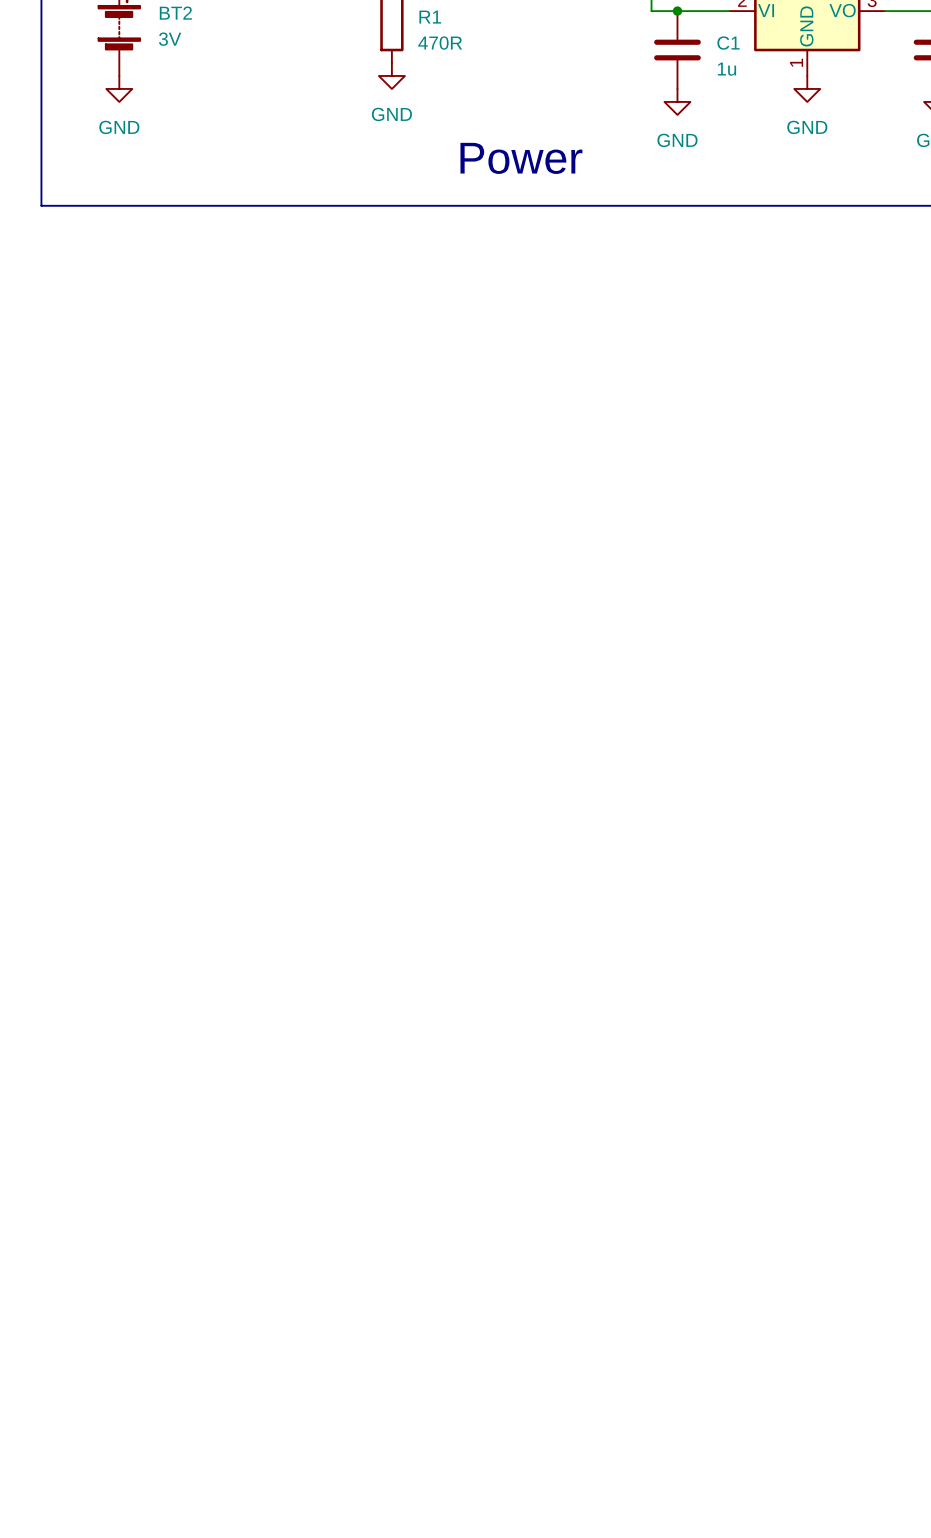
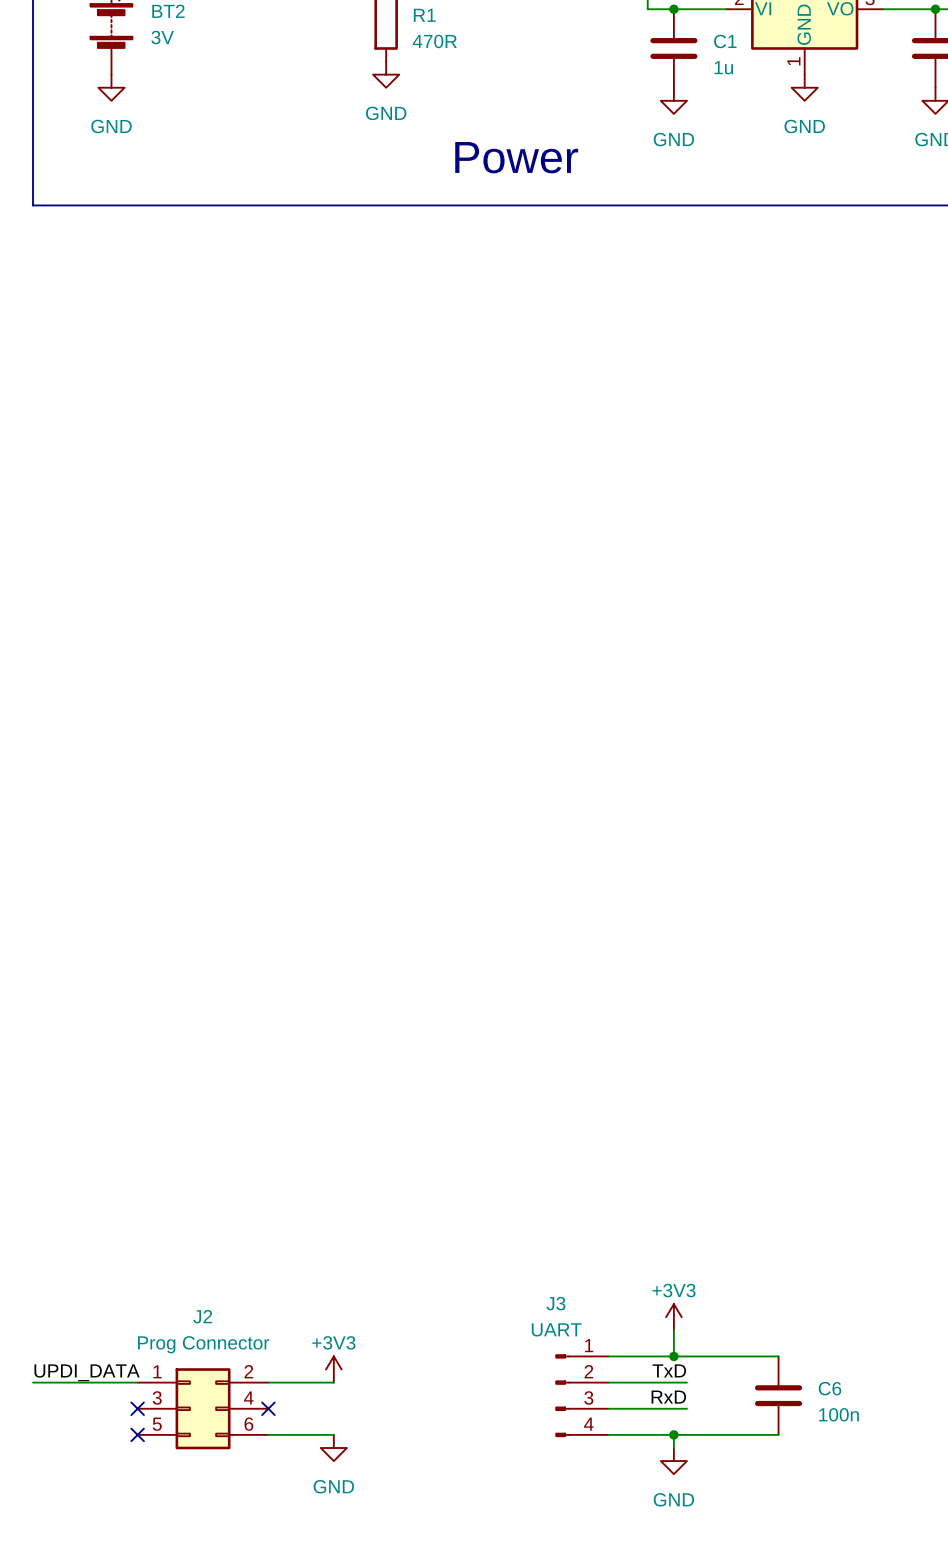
power symbol: none -> +3V3 (673, 1317)
wire: none -> (673, 1330) (673, 1356)
wire: none -> (608, 1356) (778, 1356)
junction: none -> (673, 1356)
power symbol: none -> +3V3 (333, 1369)
label: none -> TxD (669, 1370)
label: none -> UPDI_DATA (87, 1372)
wire: none -> (33, 1382) (137, 1382)
wire: none -> (268, 1382) (333, 1382)
wire: none -> (608, 1382) (686, 1382)
J3: none -> UART (581, 1395)
C6: none -> 100n (778, 1395)
label: none -> RxD (668, 1397)
no-connect mark: none -> (137, 1408)
J2: none -> Prog Connector (203, 1408)
no-connect mark: none -> (268, 1408)
wire: none -> (608, 1408) (686, 1408)
no-connect mark: none -> (137, 1434)
wire: none -> (268, 1434) (333, 1434)
wire: none -> (608, 1434) (778, 1434)
wire: none -> (673, 1434) (673, 1447)
junction: none -> (673, 1434)
power symbol: none -> GND (333, 1447)
power symbol: none -> GND (673, 1461)

